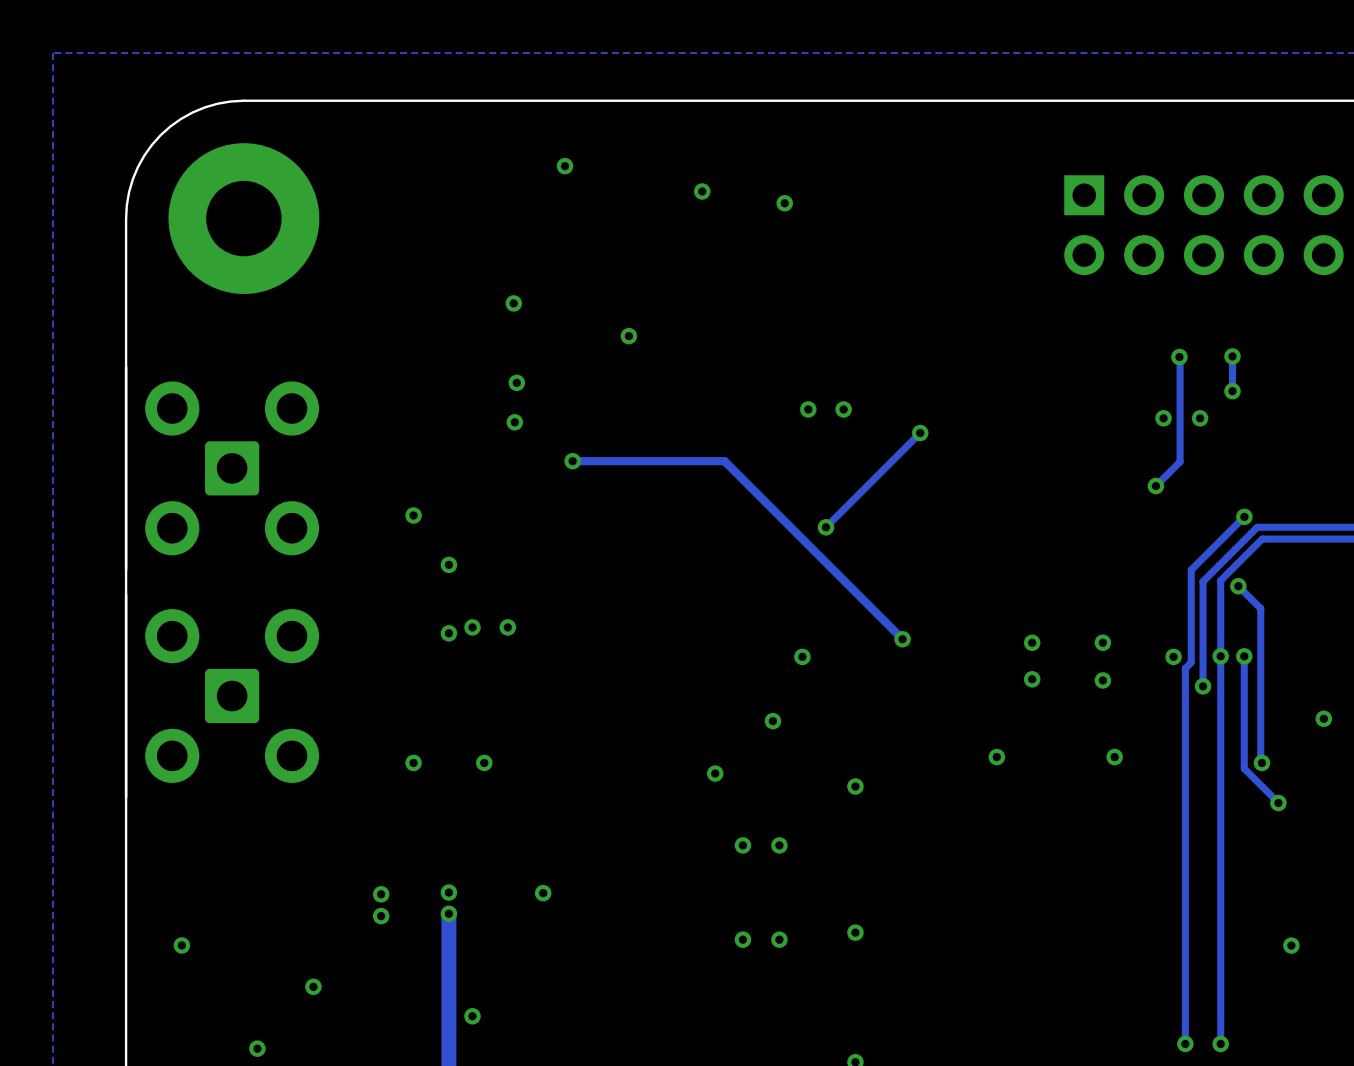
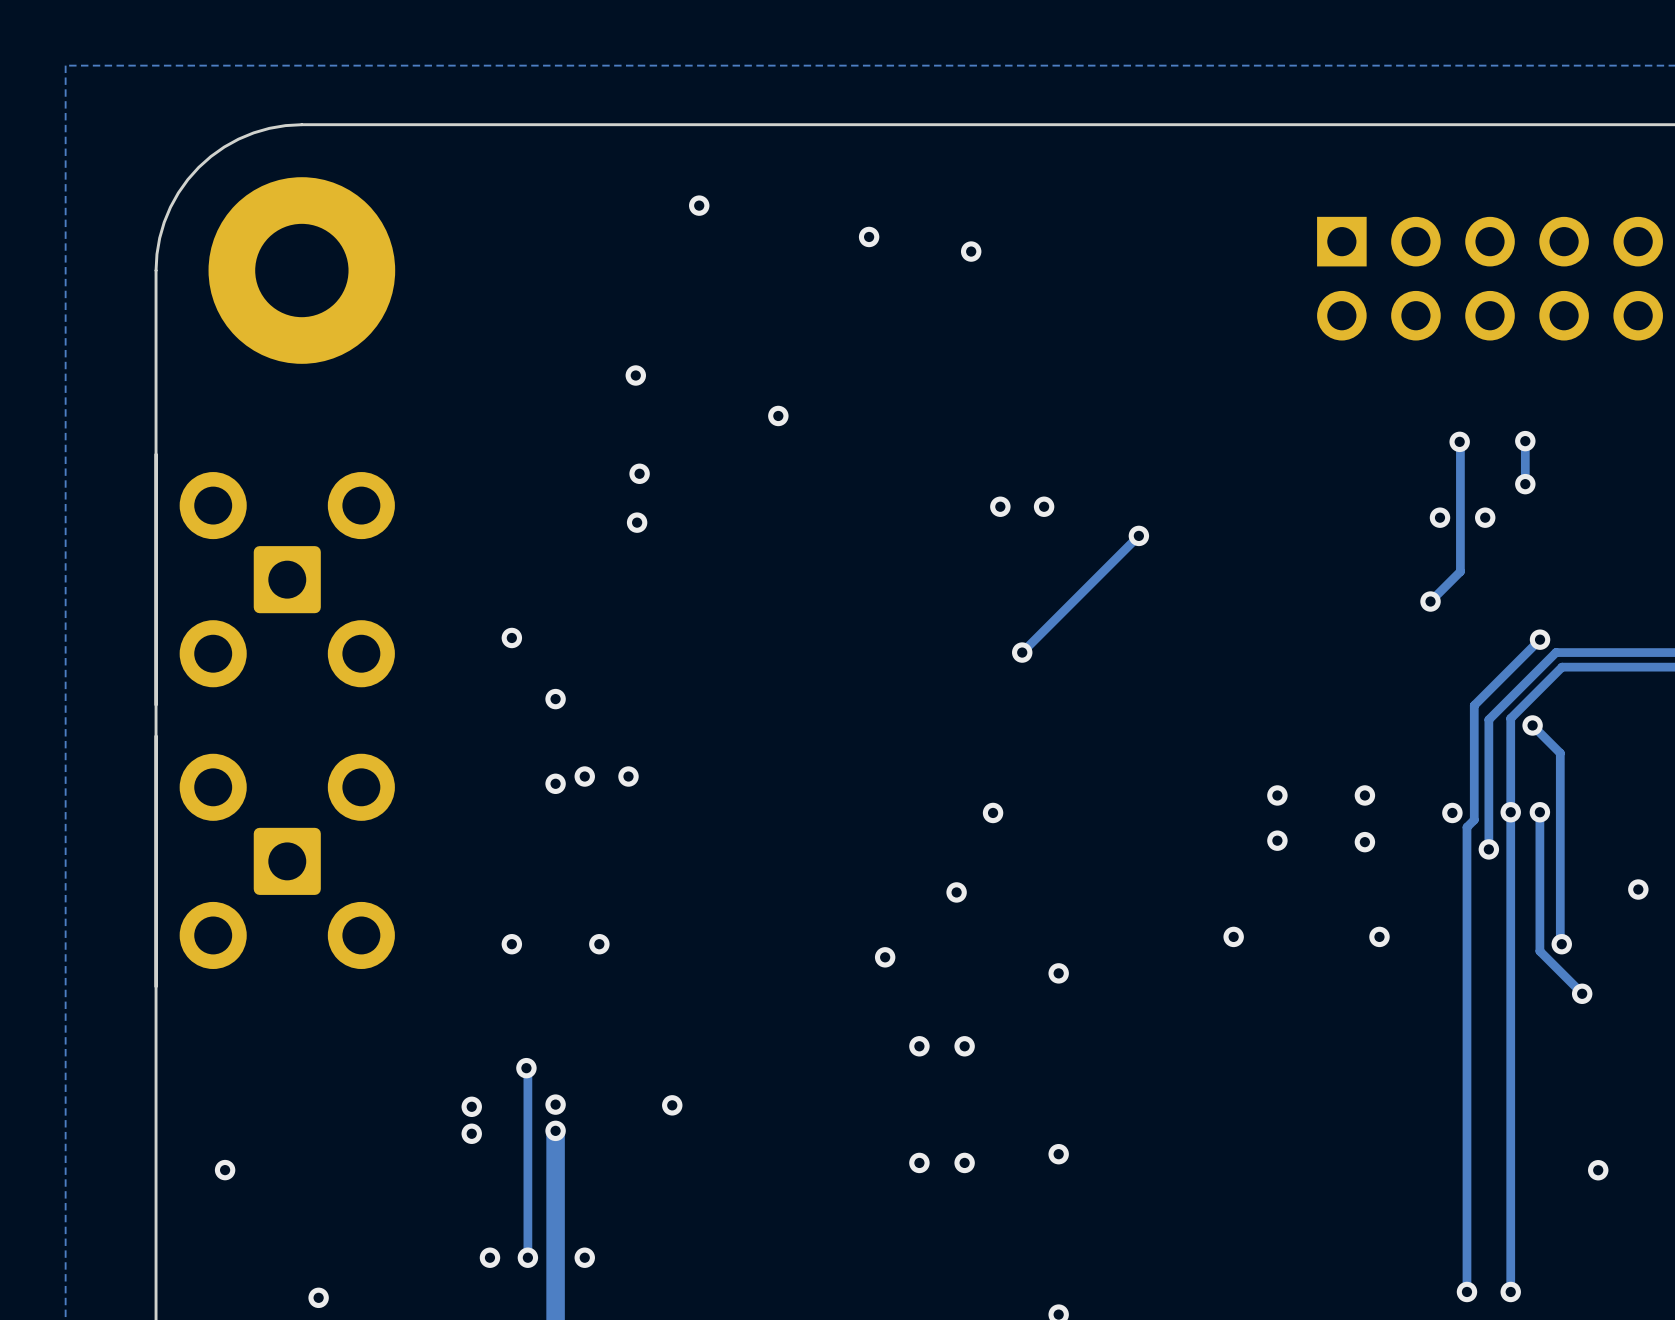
track: (572, 461) (724, 461) (902, 639) -> none
via: (572, 461) -> none
via: (902, 639) -> none
track: none -> (526, 1068) (527, 1257)
via: none -> (526, 1068)
via: (313, 986) -> none
via: none -> (489, 1257)
via: none -> (527, 1257)

